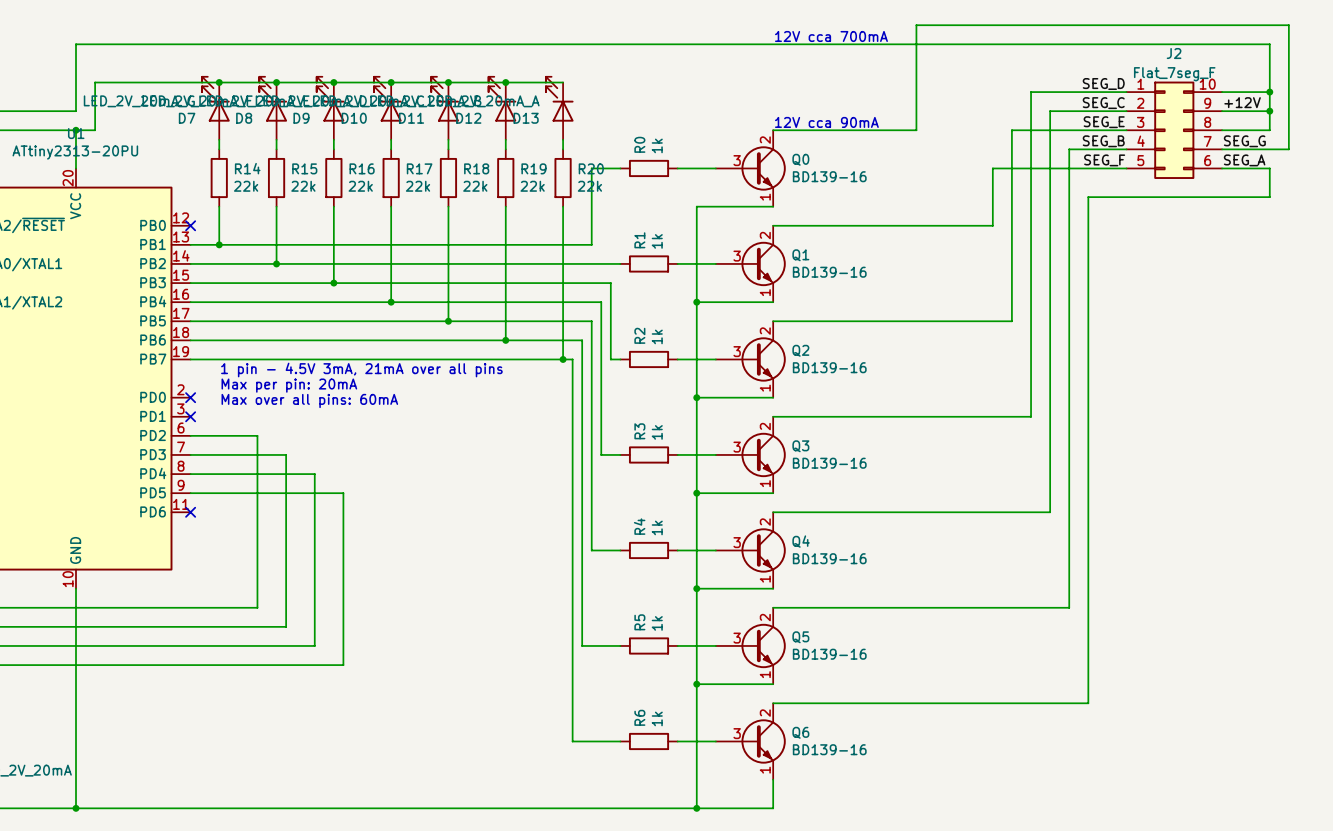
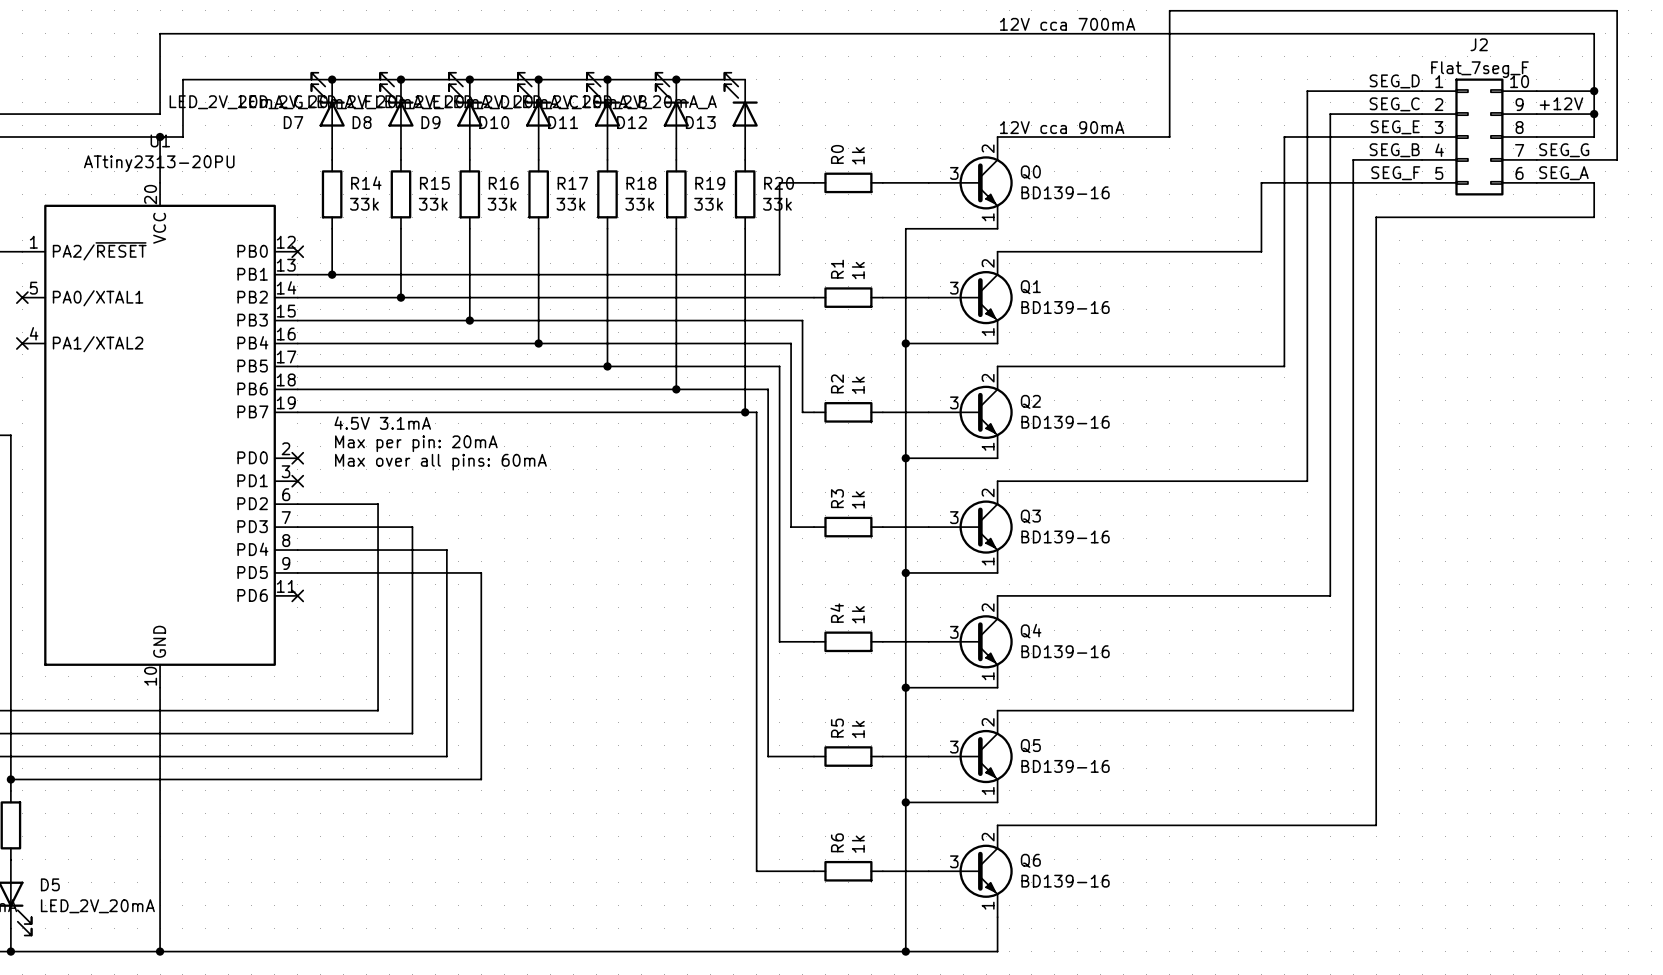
R14 value: 22k (246, 186) -> 33k (364, 204)
R15 value: 22k (303, 186) -> 33k (433, 204)
R16 value: 22k (360, 186) -> 33k (502, 204)
R17 value: 22k (418, 186) -> 33k (570, 204)
R18 value: 22k (475, 186) -> 33k (639, 204)
R19 value: 22k (532, 186) -> 33k (708, 204)
R20 value: 22k (589, 186) -> 33k (777, 204)
text: 1 pin - 4.5V 3mA, 21mA over all pins (361, 370) -> 4.5V 3.1mA (382, 423)

